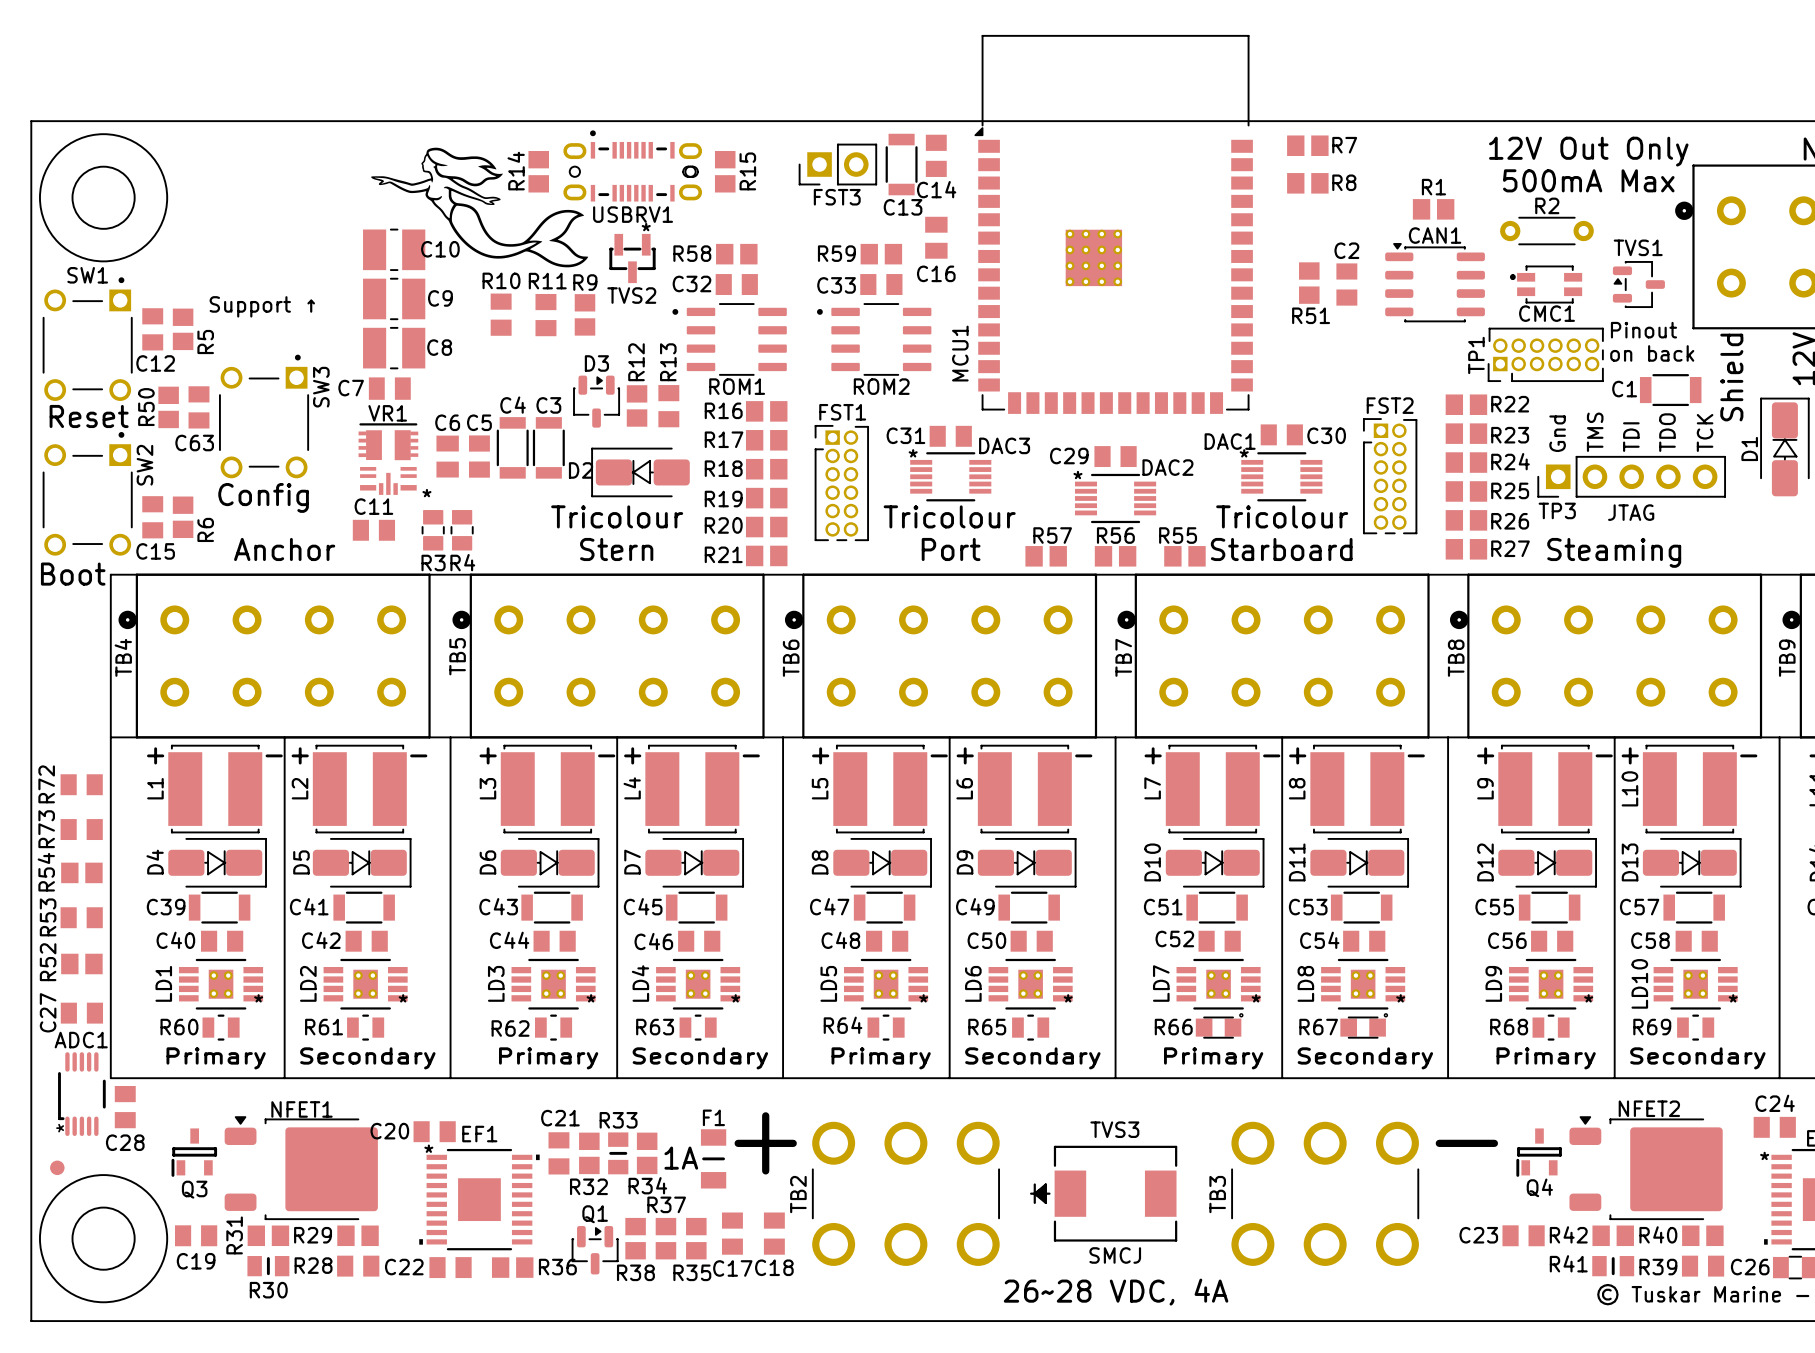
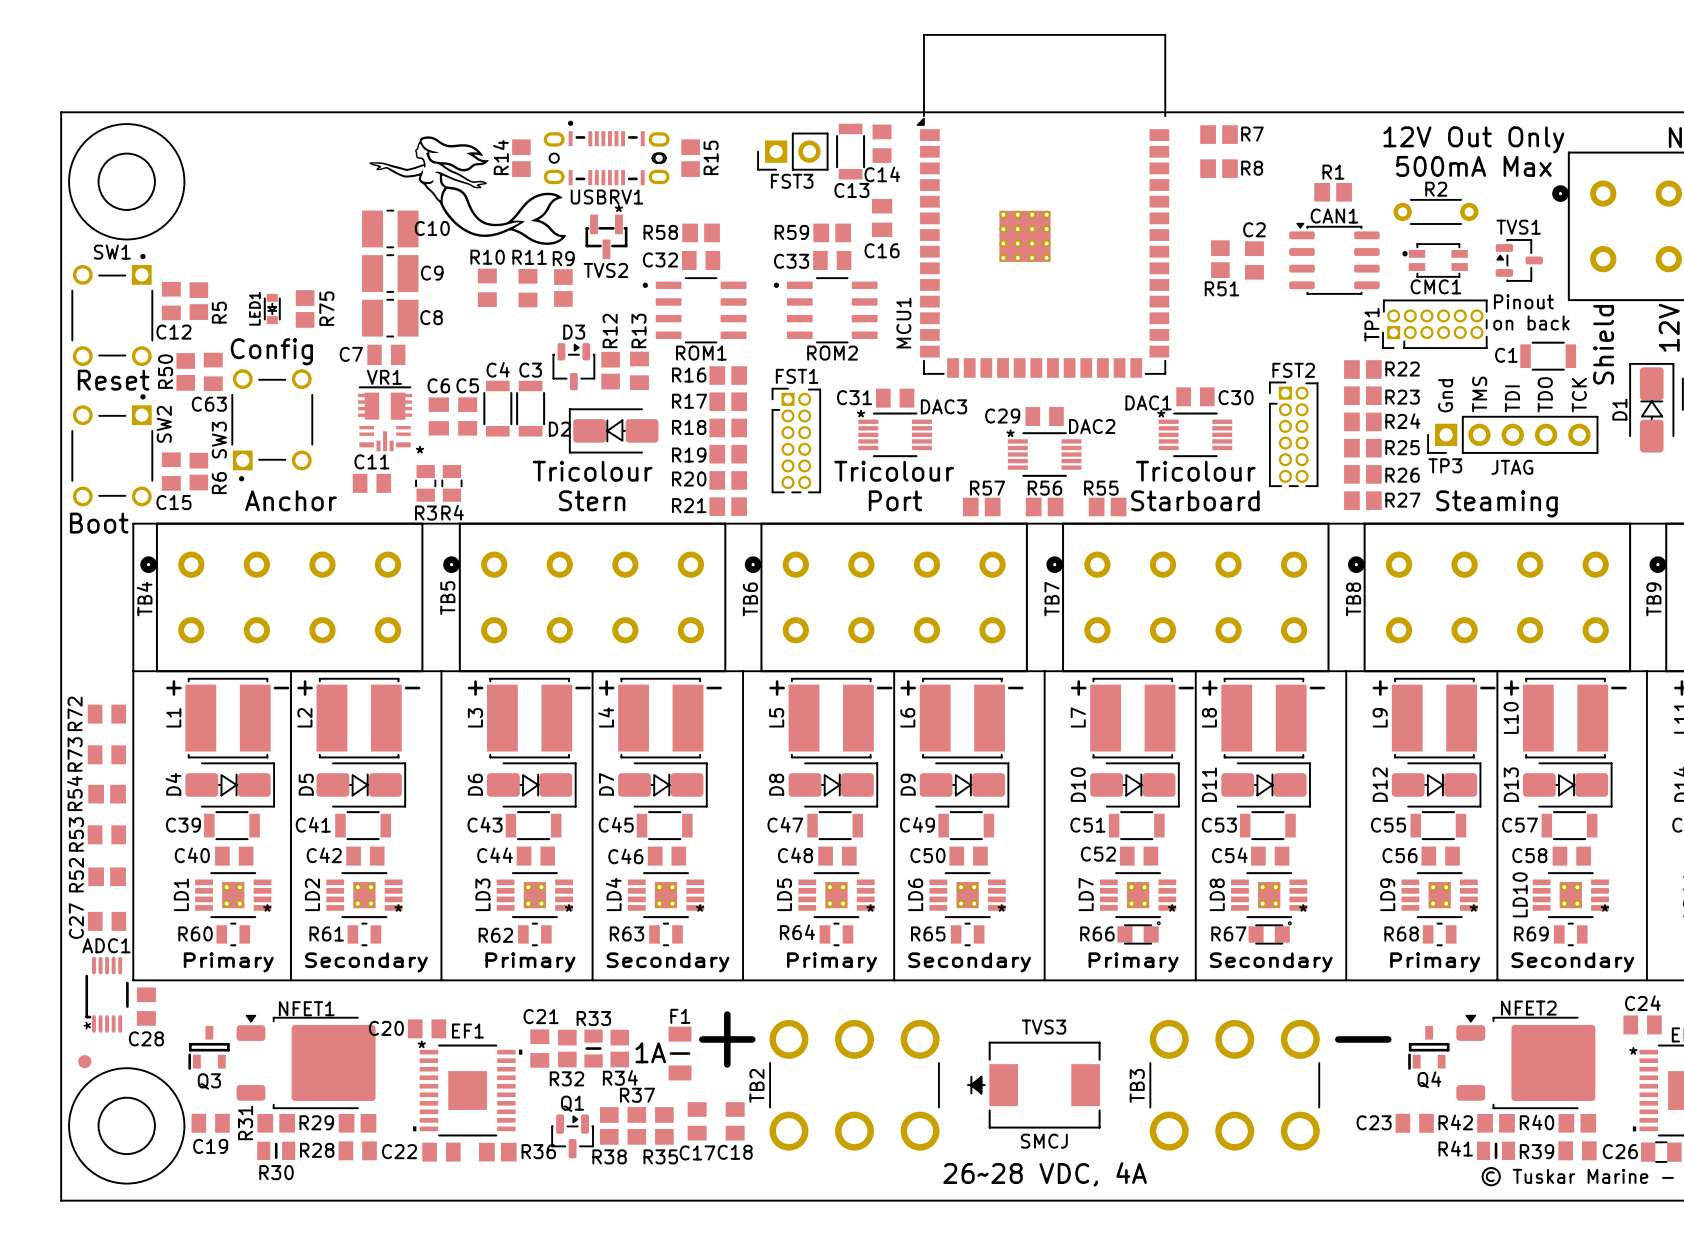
text: Support ↑ (262, 306) -> none
LED1: none -> (272, 308)
R75: none -> (305, 308)
SW3 rotation: 0° (264, 416) -> 180° (272, 425)
text position: Config (263, 497) -> Config (271, 351)

